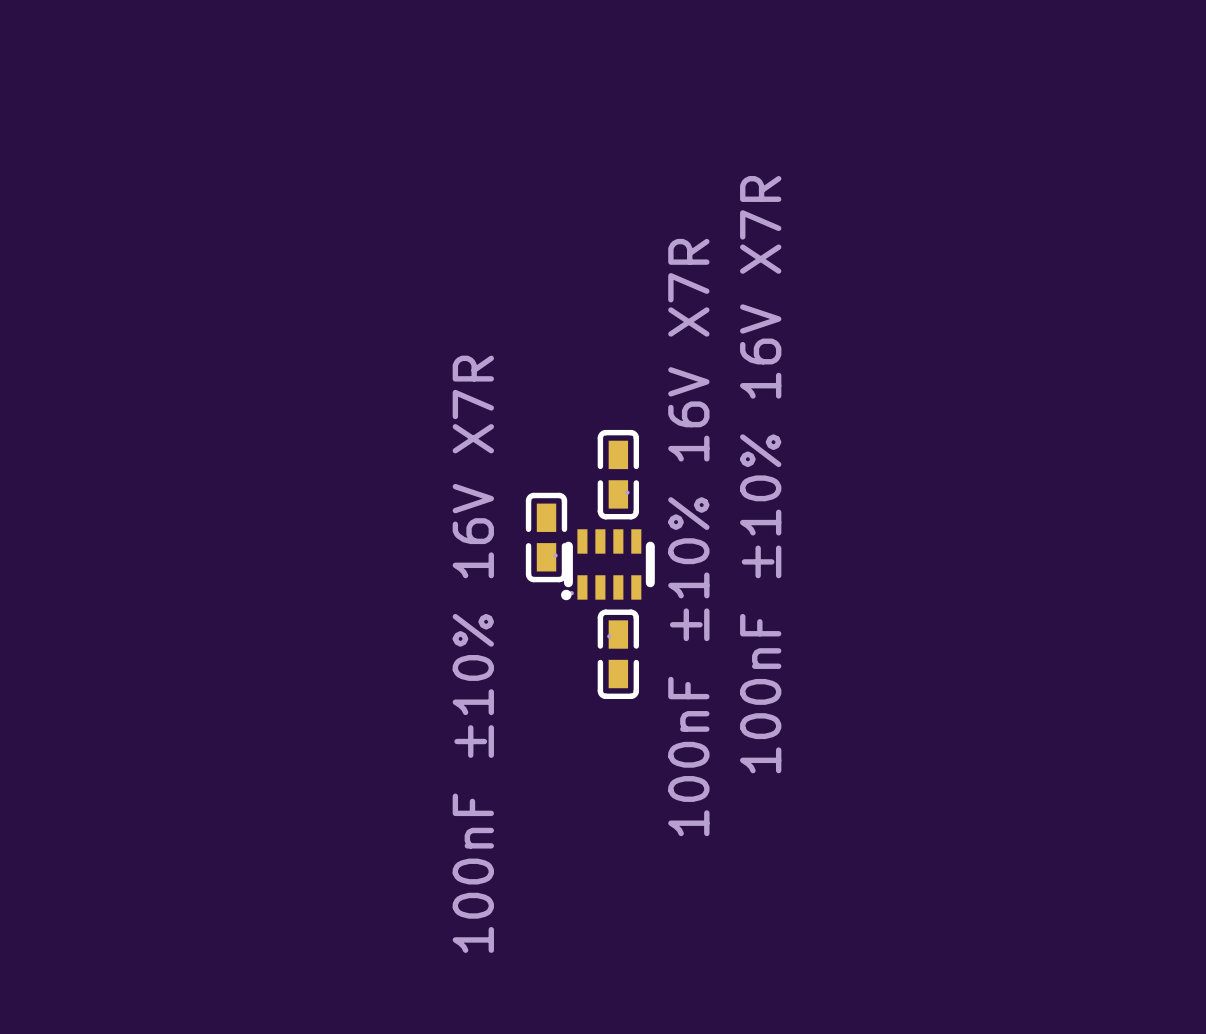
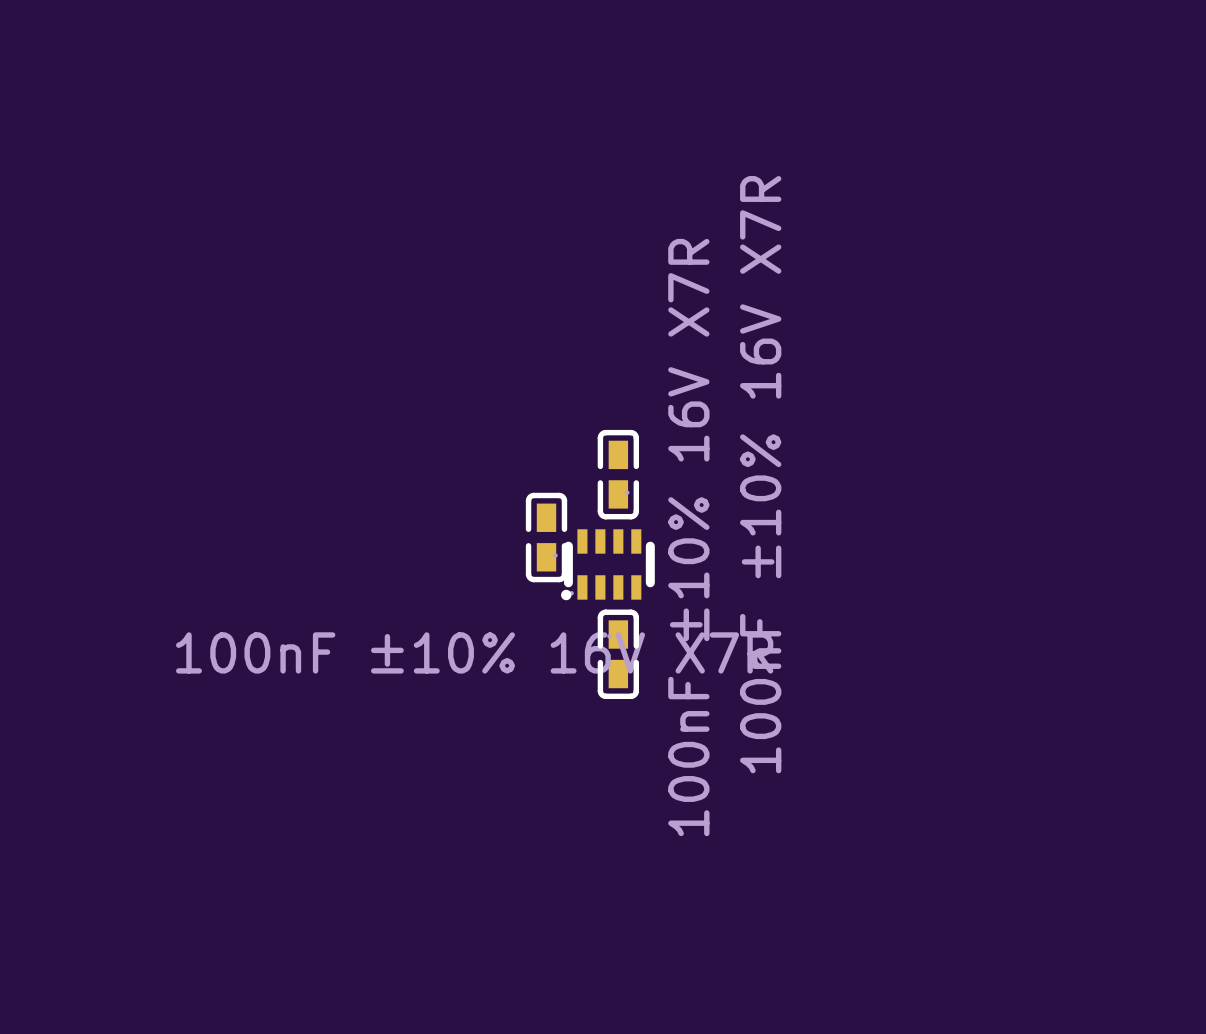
part value rotation: 0° (473, 654) -> 90° clockwise (474, 652)

